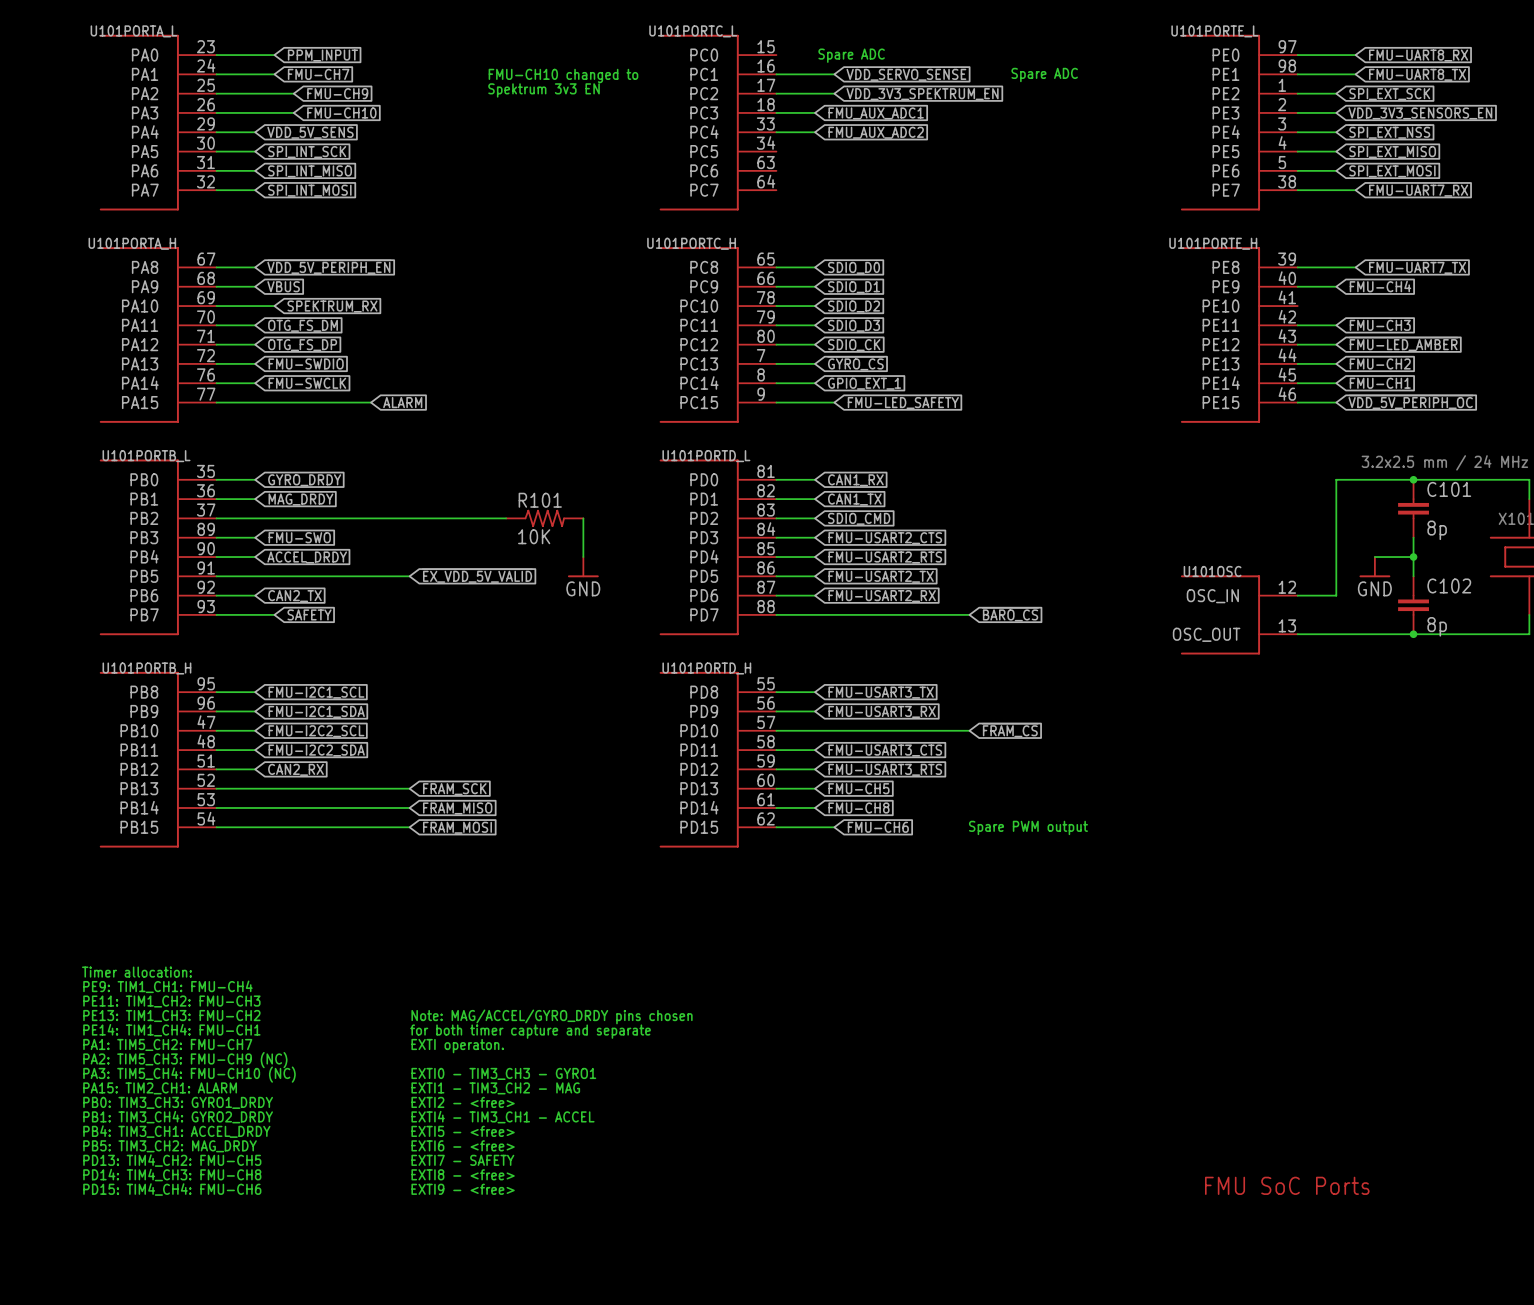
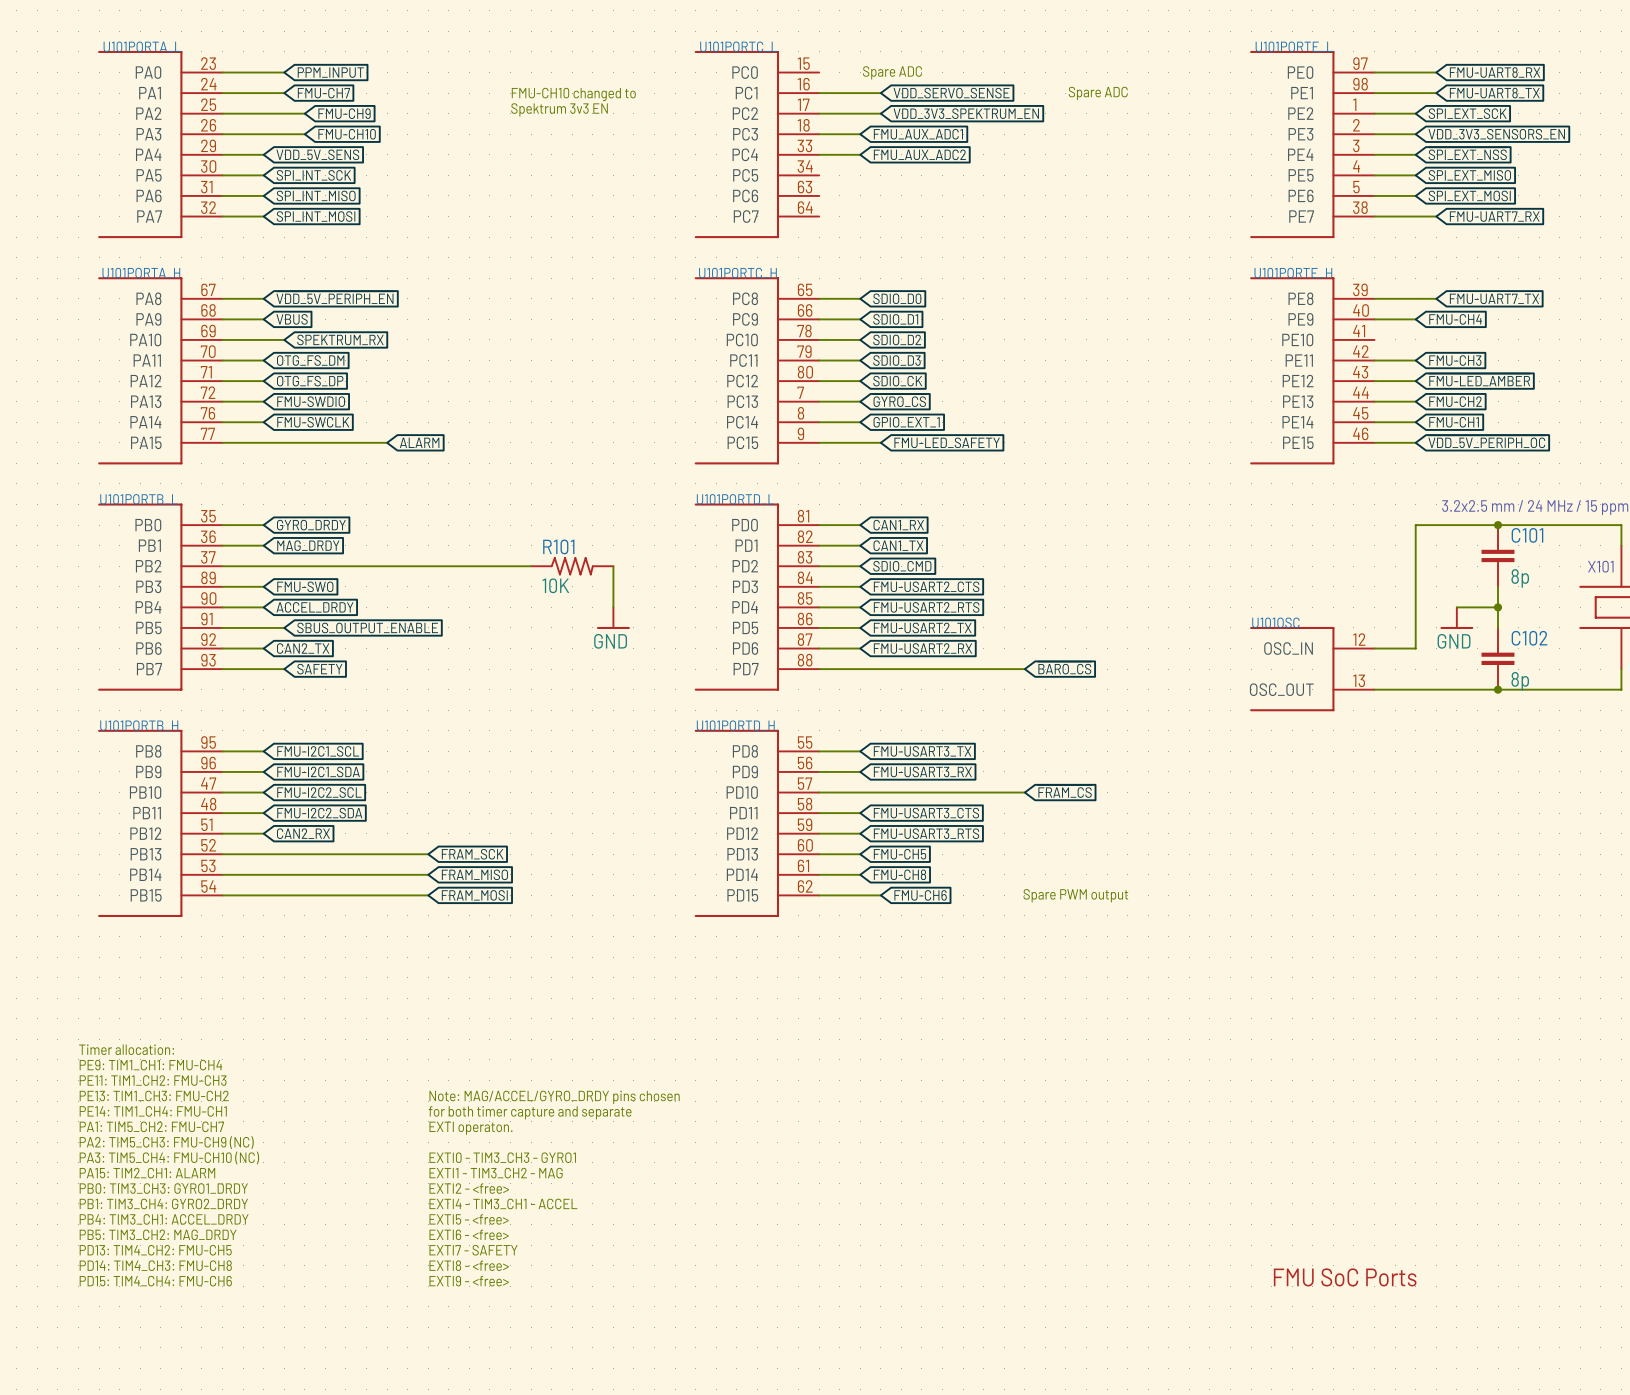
global label: ~{EX_VDD_5V_VALID} (477, 575) -> none
wire: (274, 576) (409, 576) -> none
global label: none -> SBUS_OUTPUT_ENABLE (367, 627)

